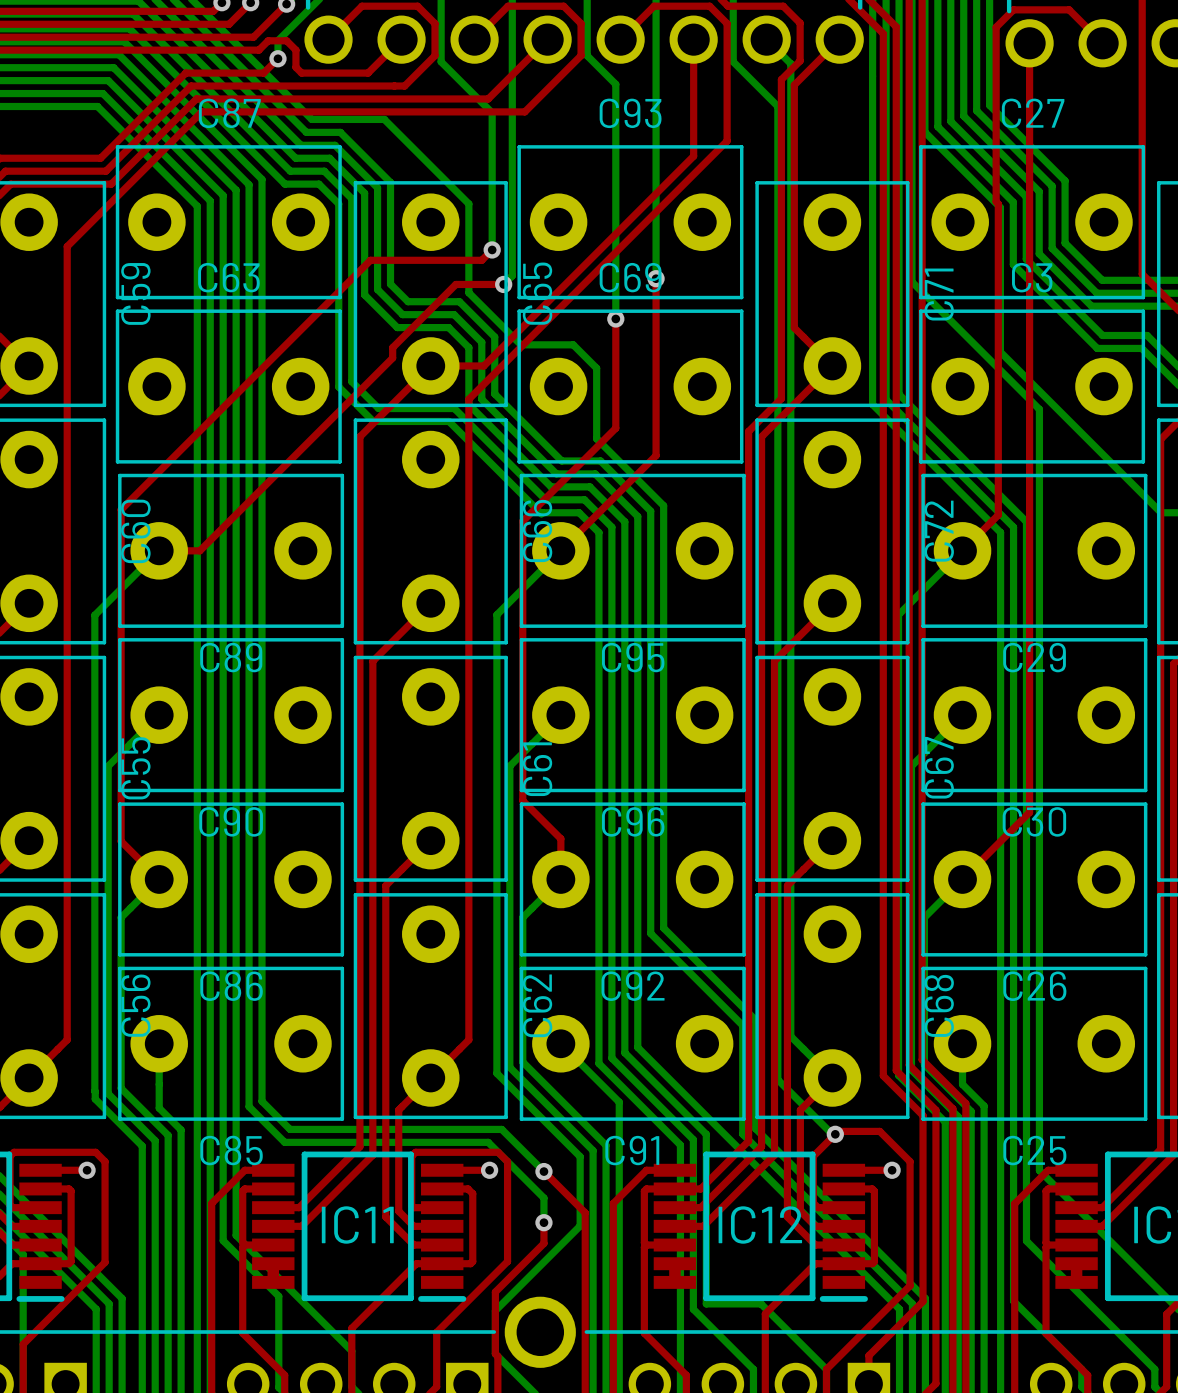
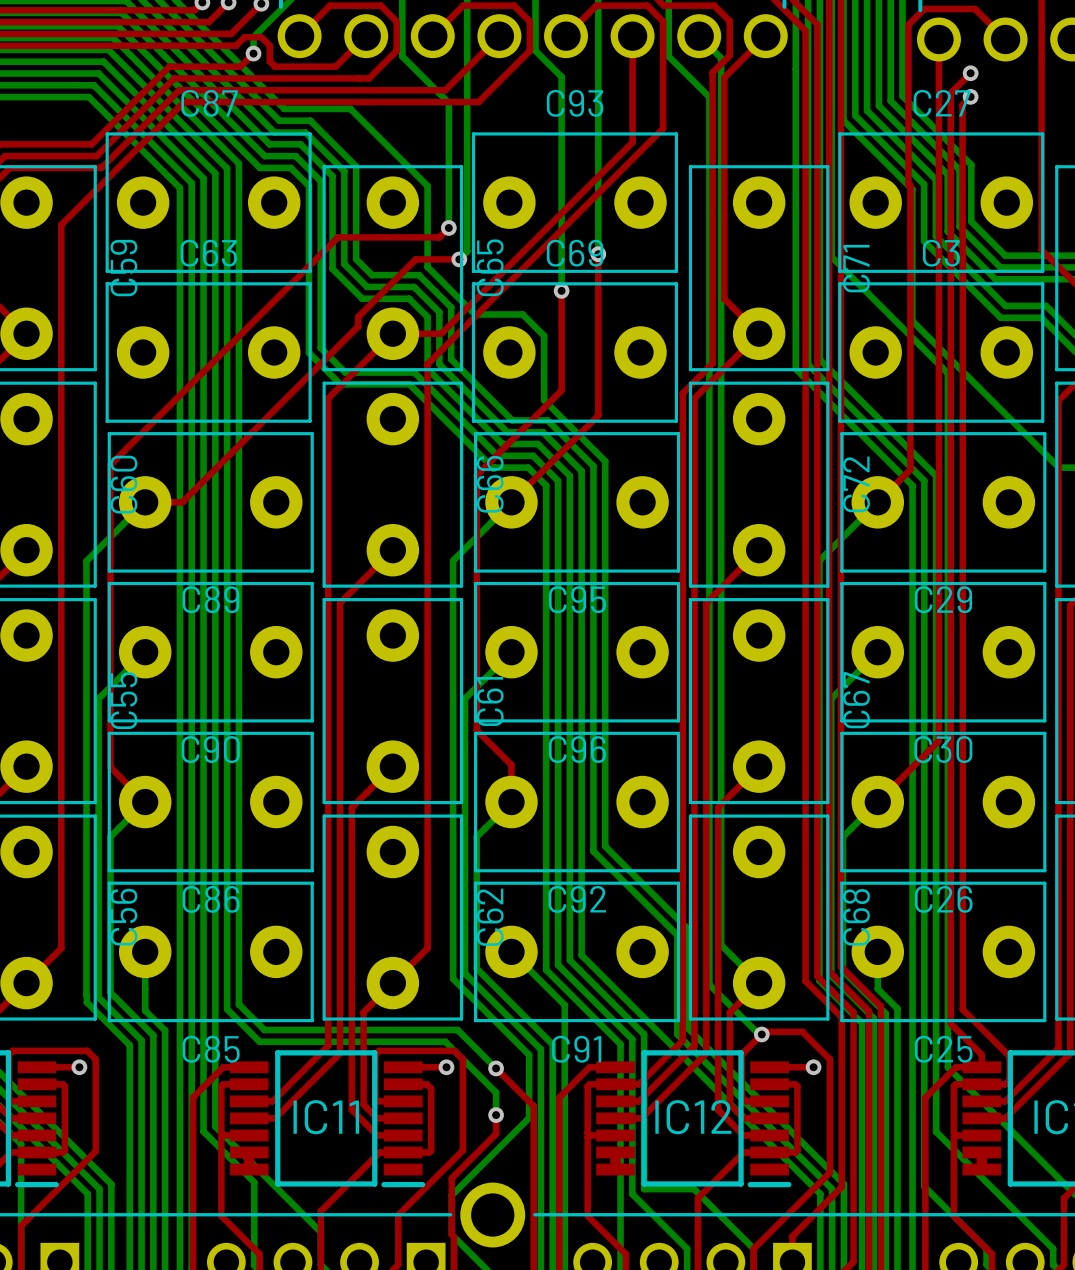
top track: none -> (970, 73) (950, 93) (950, 1023) (981, 1054) (981, 1067)
via: none -> (970, 73)
top track: none -> (970, 96) (962, 104) (962, 238)
via: none -> (970, 96)
top track: none -> (962, 238) (962, 1009) (1009, 1056) (1009, 1079) (1005, 1084) (981, 1084)

